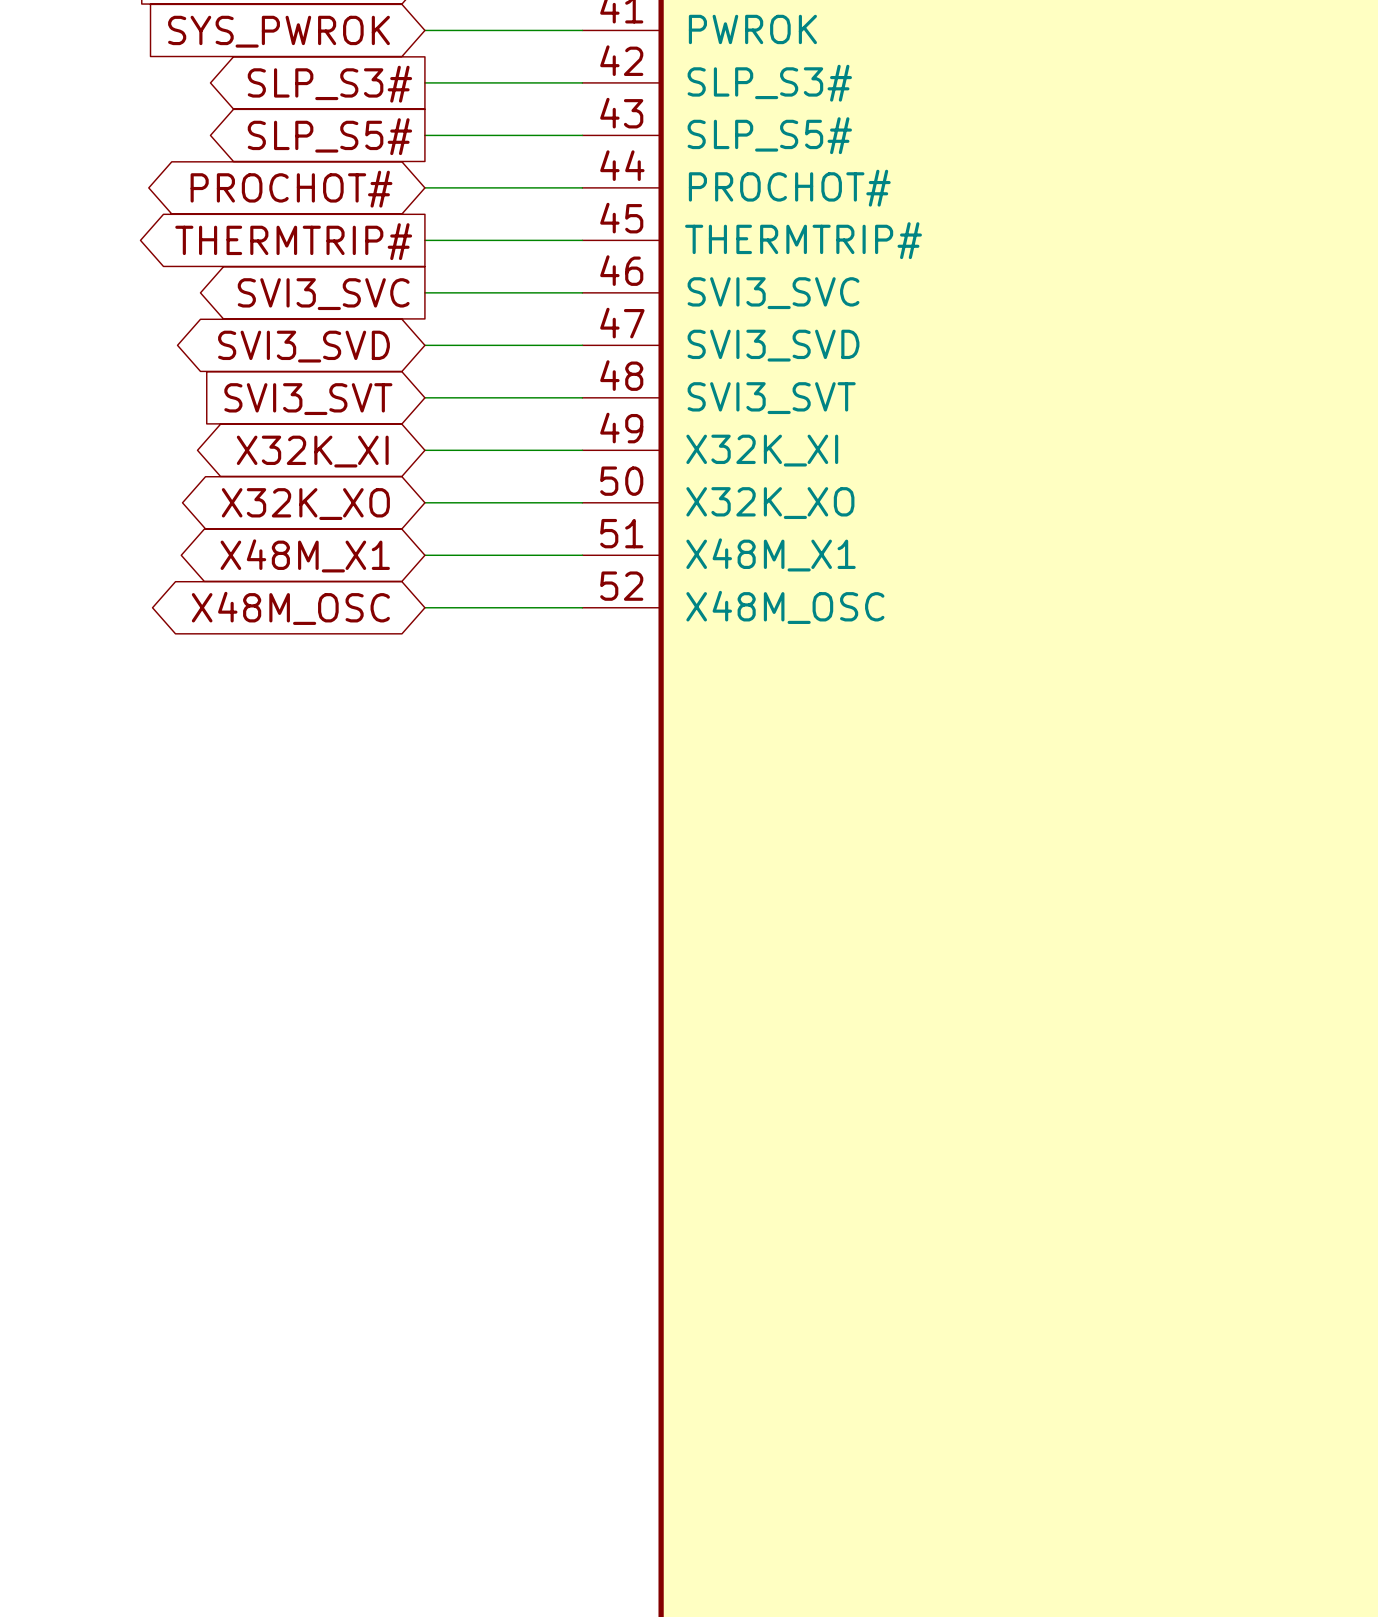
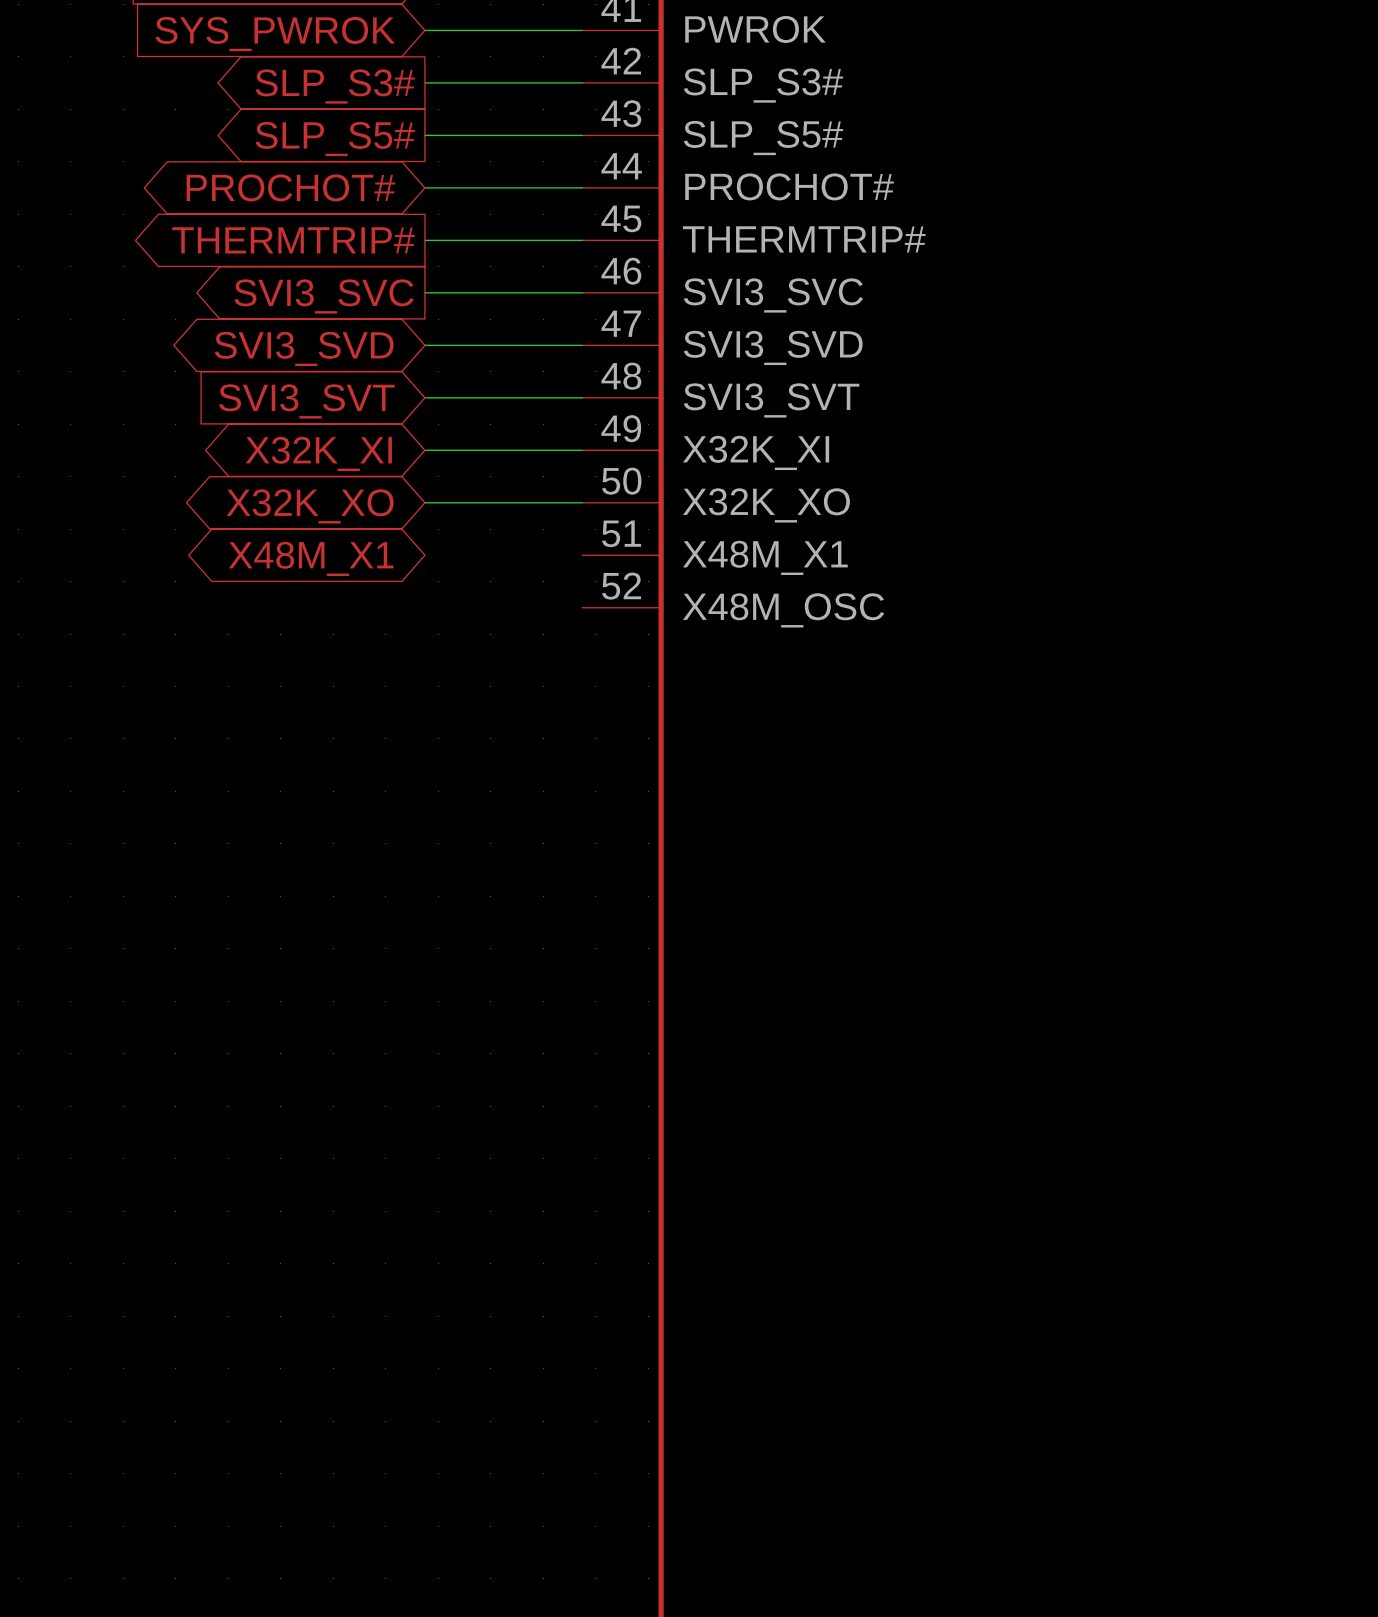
wire: (424, 555) (582, 555) -> none
wire: (424, 607) (582, 607) -> none
global label: X48M_OSC (290, 608) -> none

